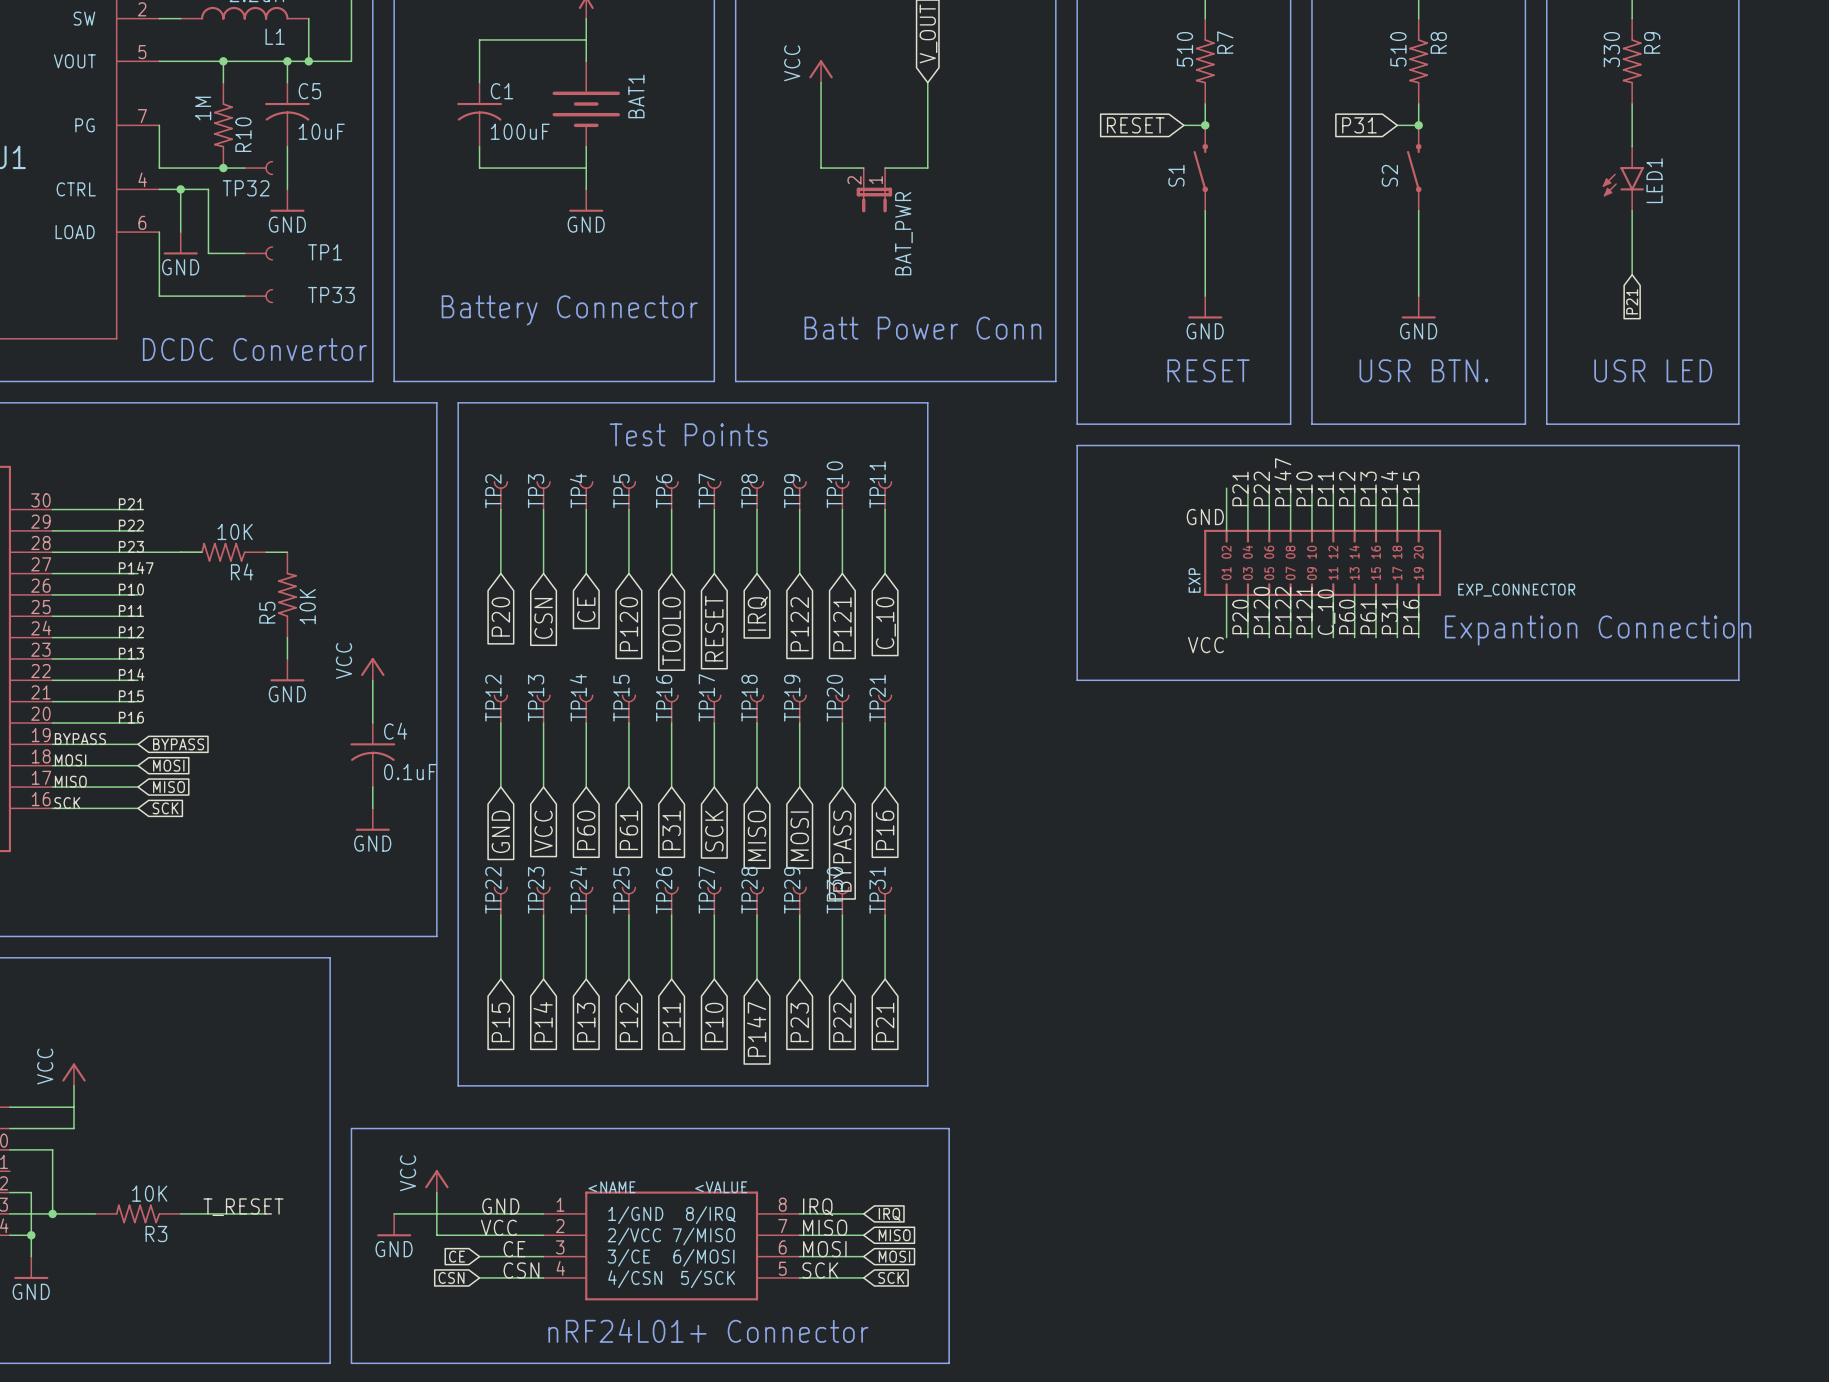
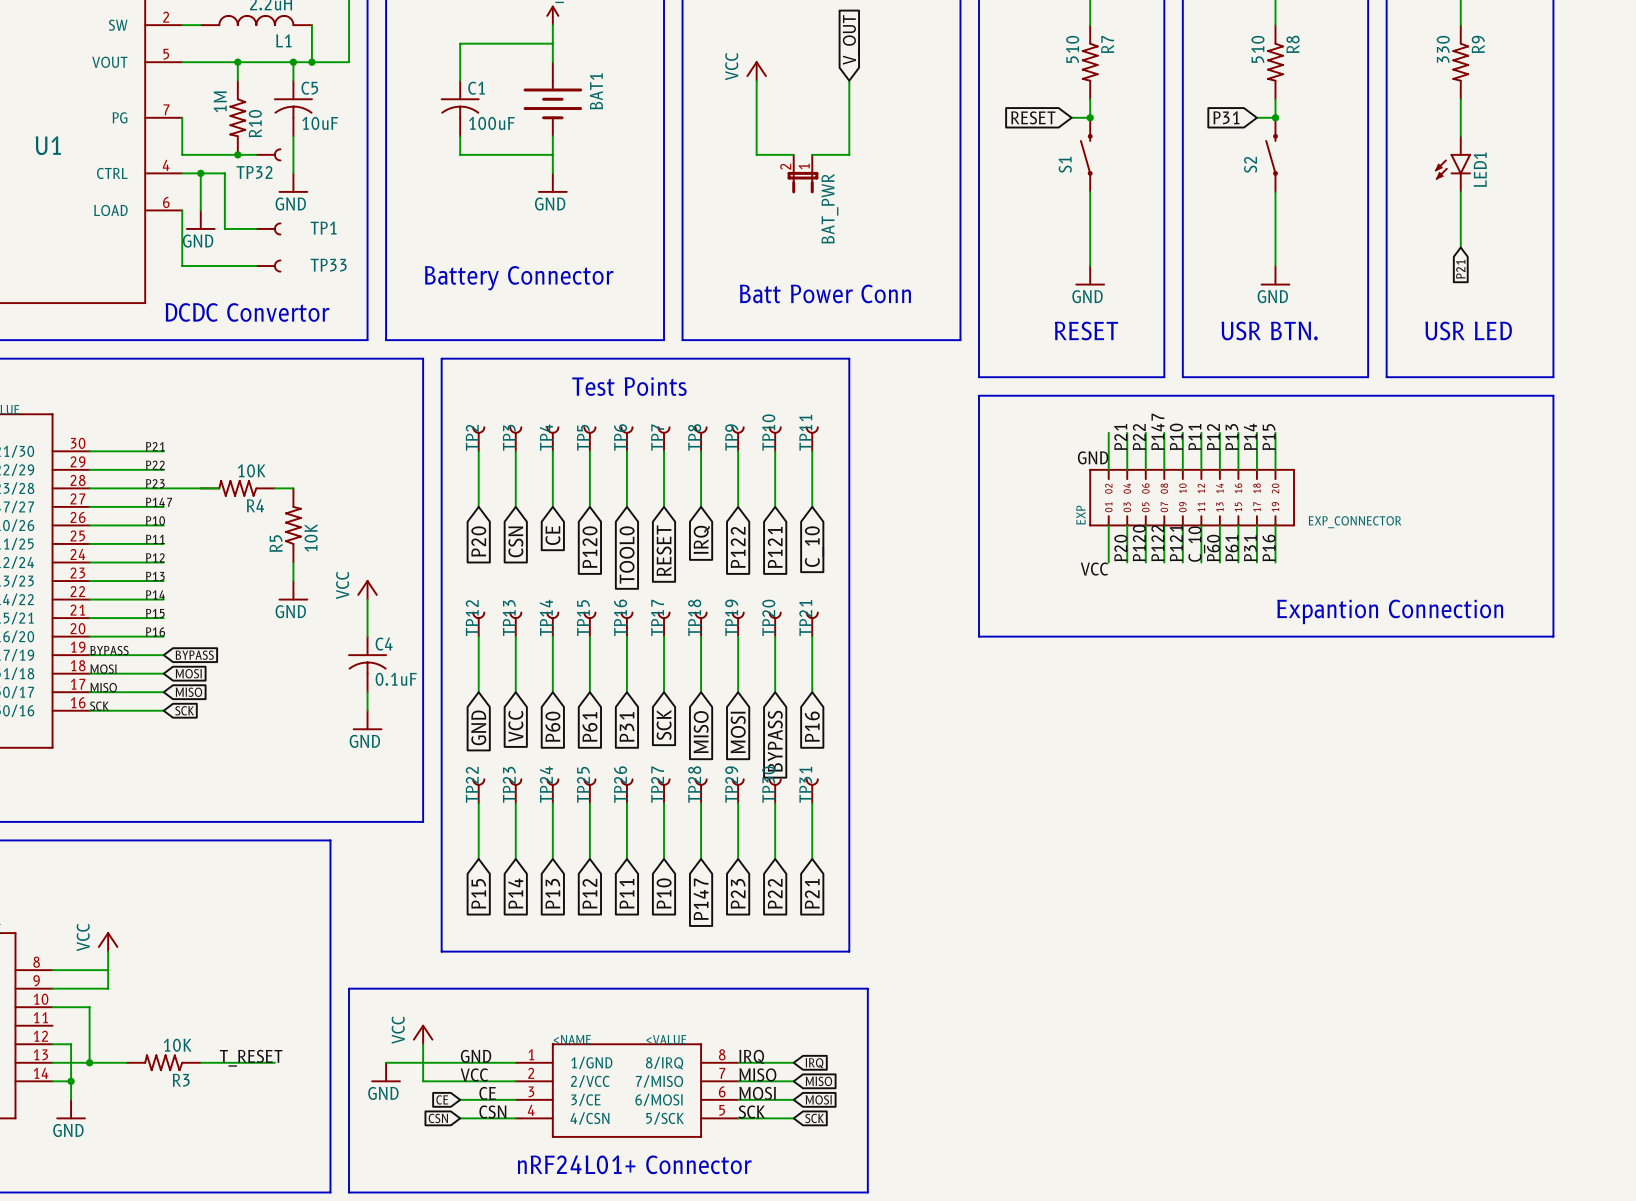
text position: Expantion Connection (1598, 630) -> Expantion Connection (1390, 611)
line: (1077, 680) (1738, 680) -> (979, 599) (979, 636) (1553, 636) (1553, 599)

